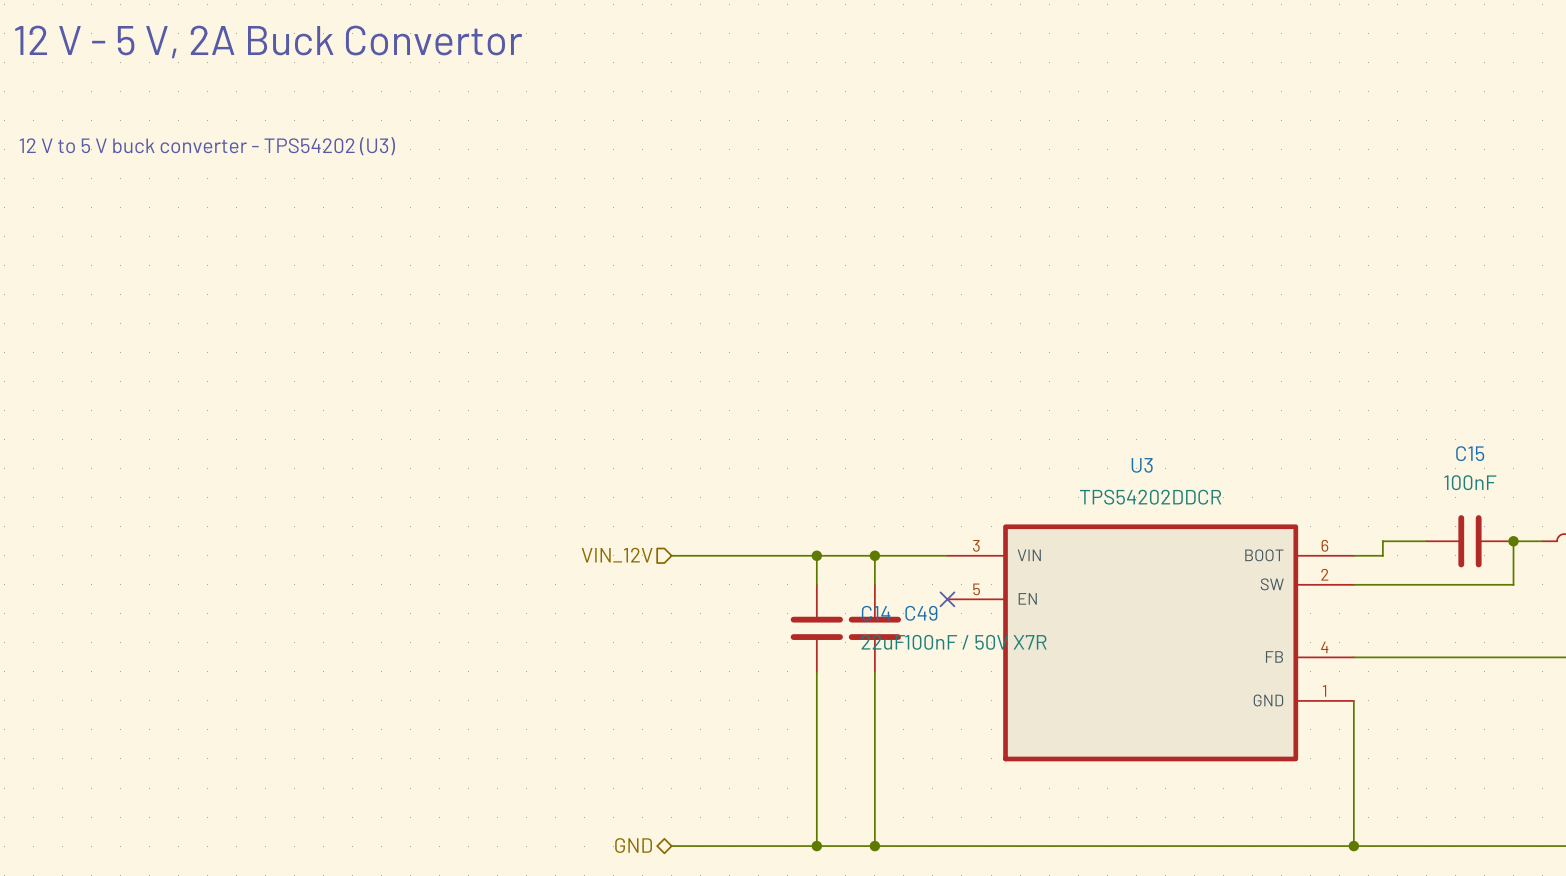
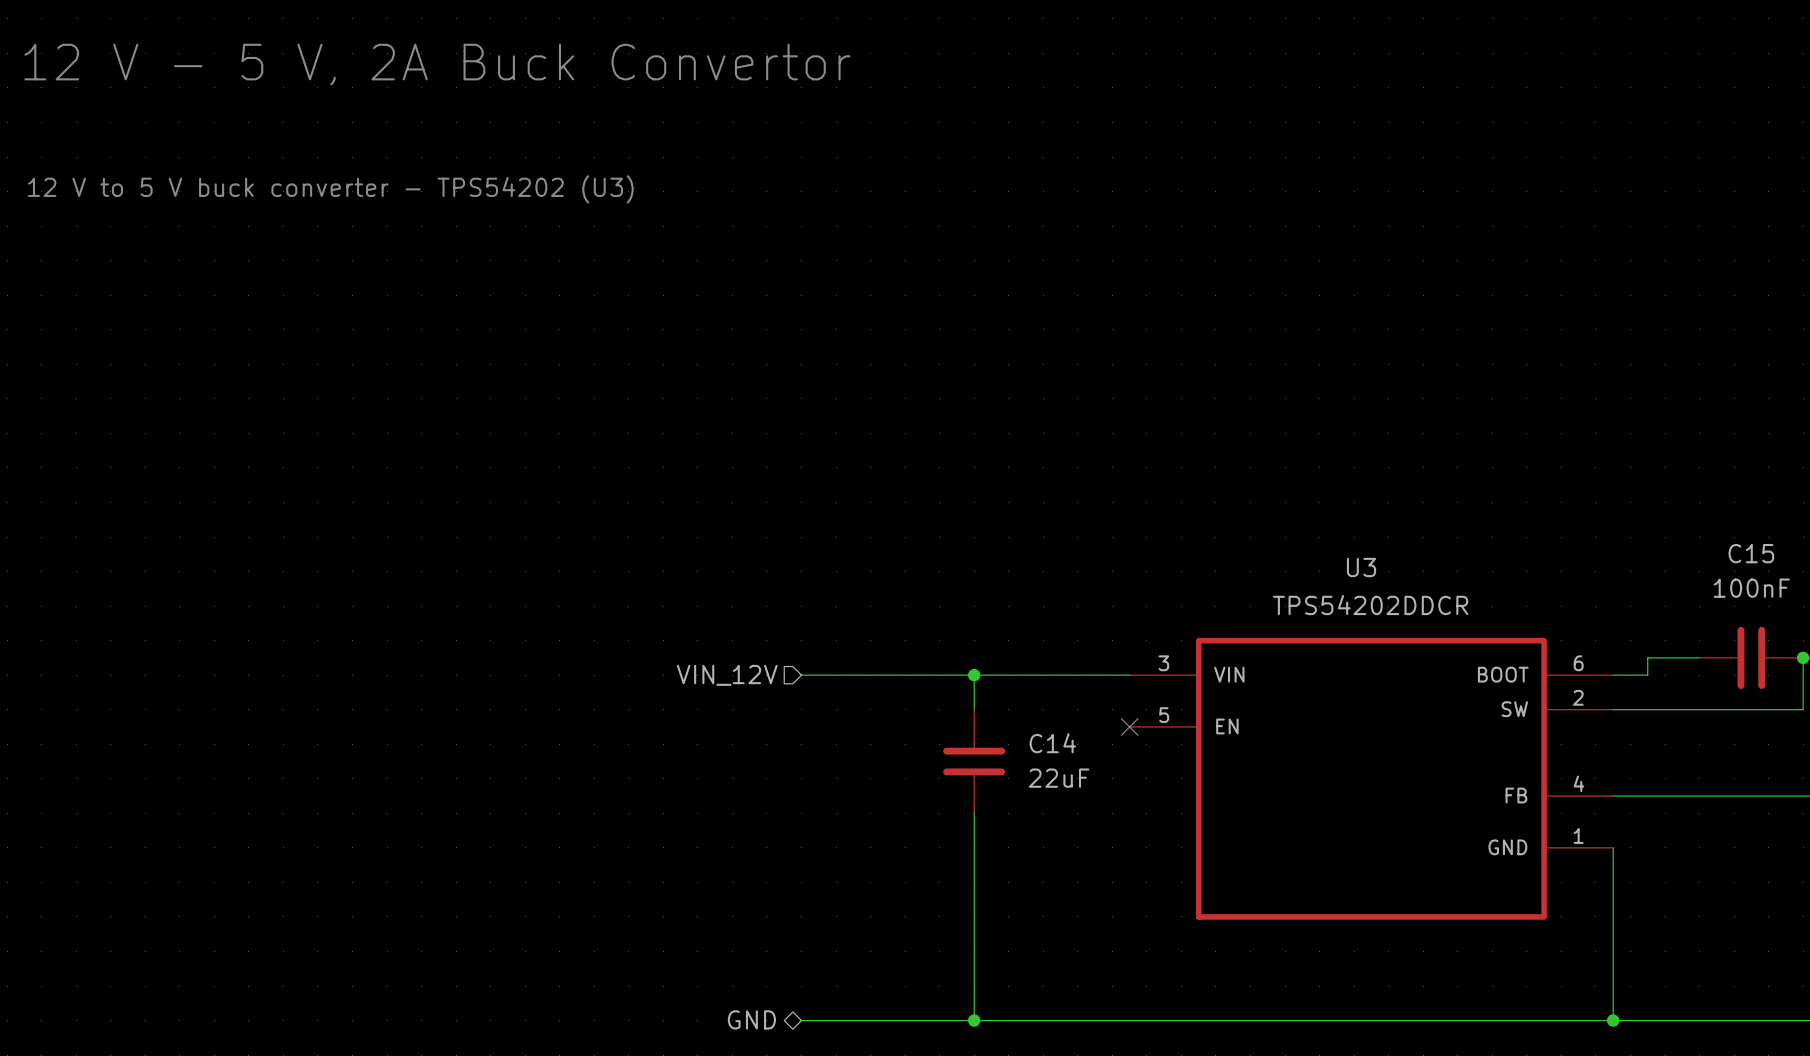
wire: (874, 555) (874, 584) -> none
junction: (874, 555) -> none
C49: 100nF / 50V X7R (874, 628) -> none
wire: (874, 671) (874, 846) -> none
junction: (874, 846) -> none

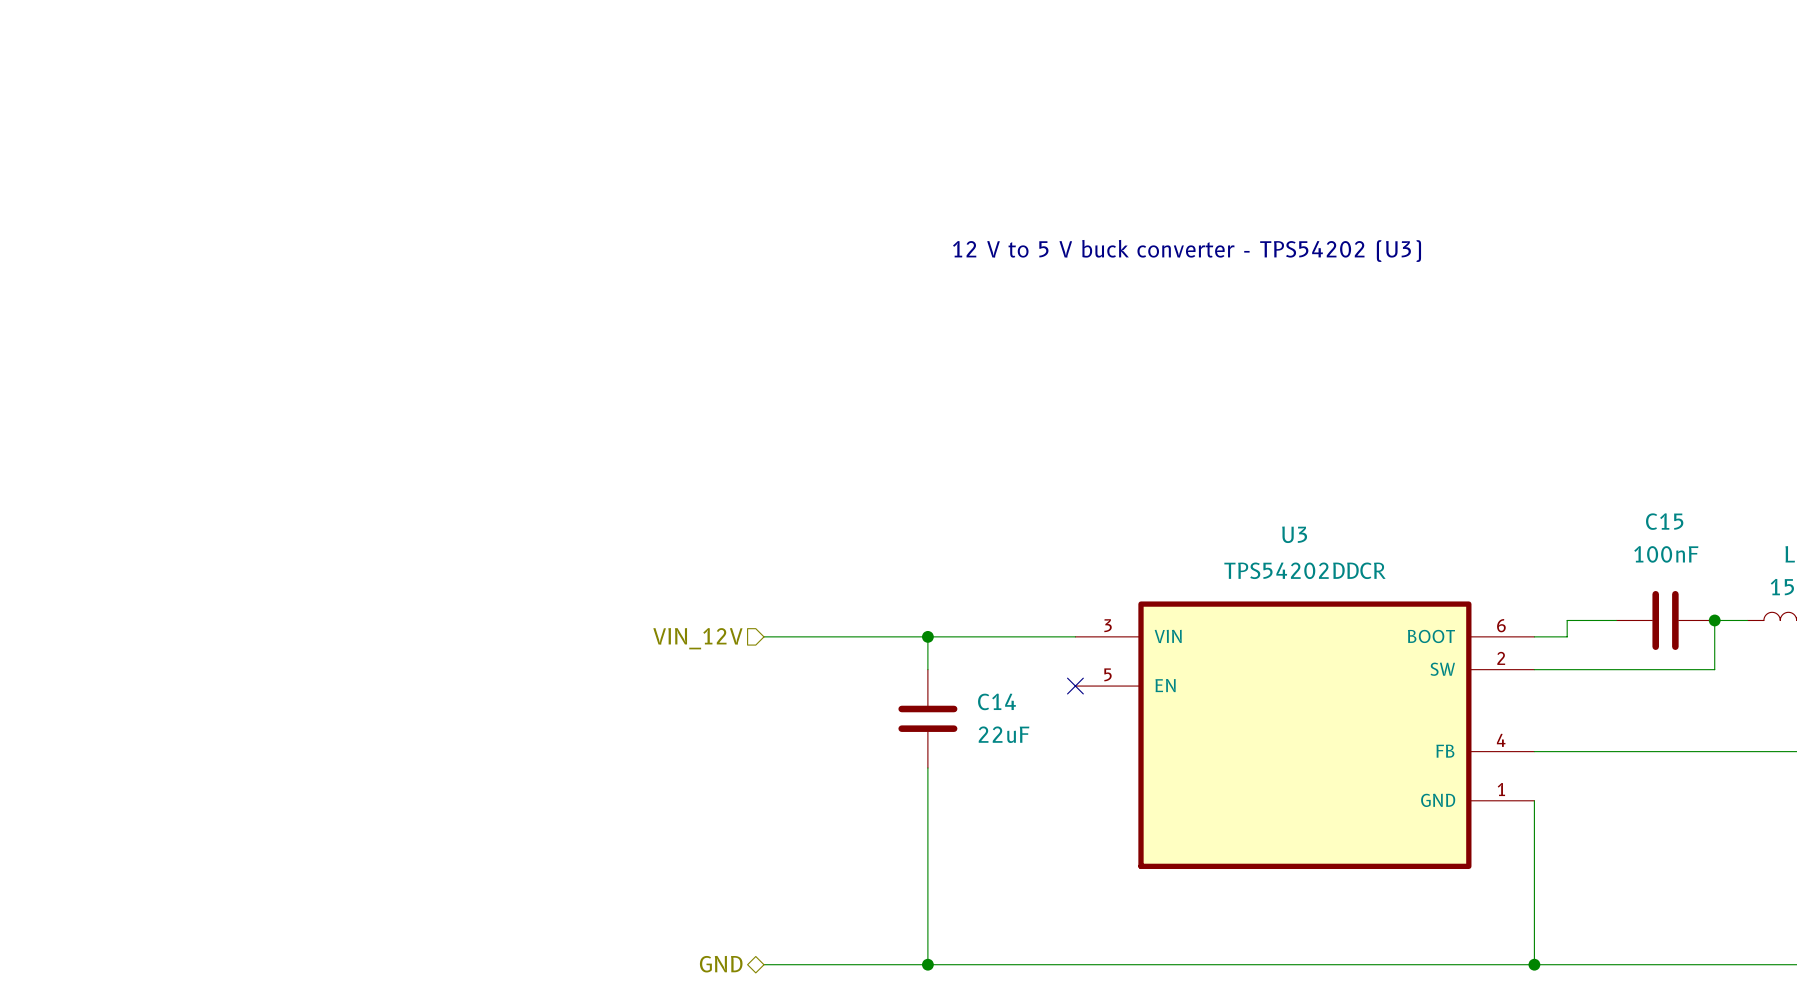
text: 12 V - 5 V, 2A Buck Convertor (437, 64) -> none
text: 12 V to 5 V buck converter - TPS54202 (U3) (330, 189) -> none
text: none -> 12 V to 5 V buck converter - TPS54202 (U3) (1187, 250)

